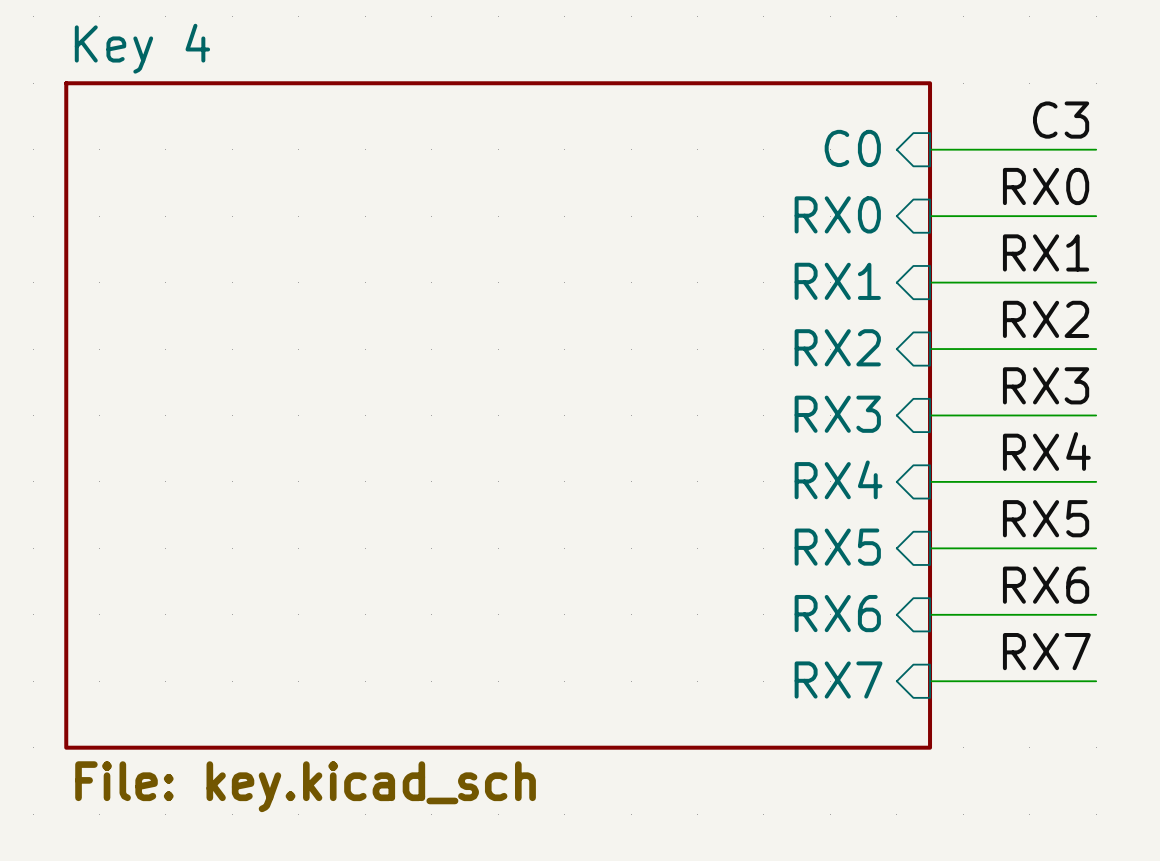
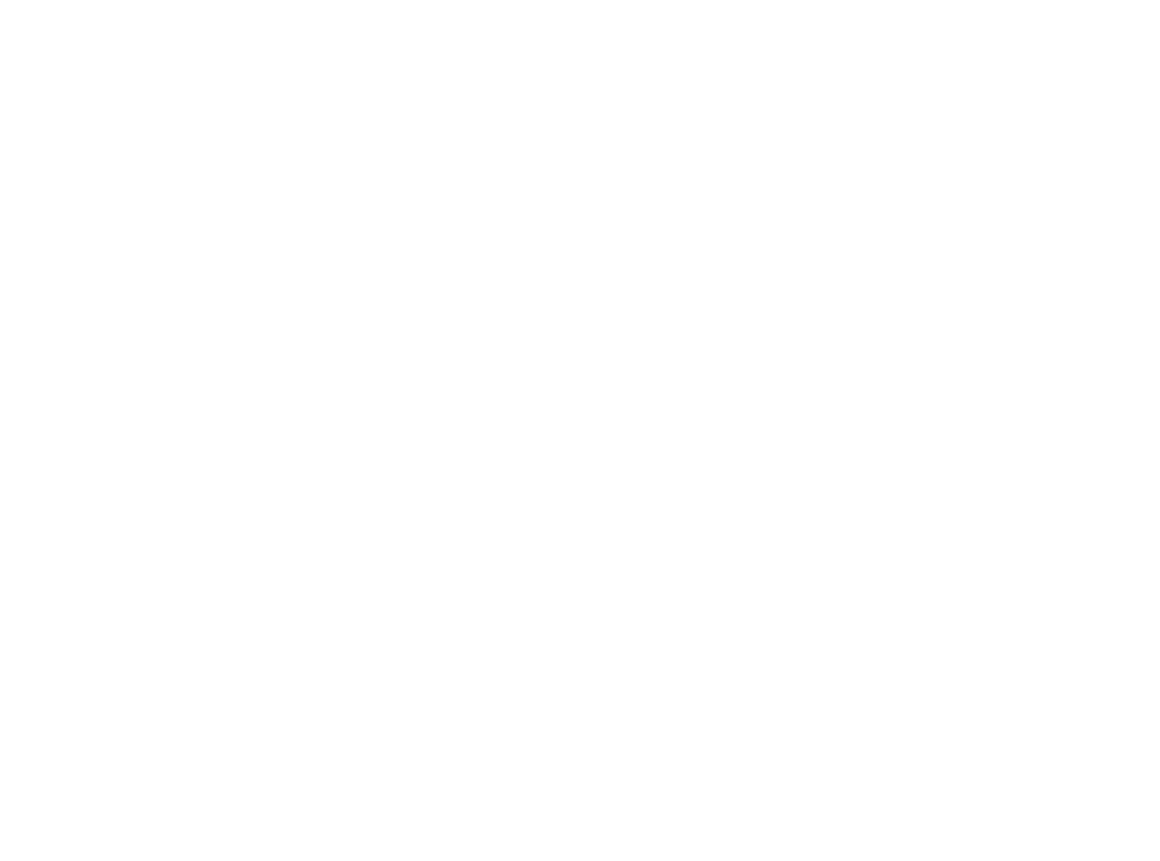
label: C3 (1061, 120) -> none
sheet pin: C0 (852, 148) -> none
wire: (930, 149) (1096, 149) -> none
label: RX0 (1046, 186) -> none
sheet pin: RX0 (837, 214) -> none
wire: (930, 216) (1096, 216) -> none
label: RX1 (1046, 252) -> none
sheet pin: RX1 (837, 281) -> none
wire: (930, 282) (1096, 282) -> none
label: RX2 (1046, 319) -> none
sheet pin: RX2 (837, 347) -> none
wire: (930, 349) (1096, 349) -> none
label: RX3 (1046, 385) -> none
sheet pin: RX3 (837, 414) -> none
sheet Key 4: File: key.kicad_sch (498, 415) -> none
wire: (930, 415) (1096, 415) -> none
label: RX4 (1046, 451) -> none
sheet pin: RX4 (838, 479) -> none
wire: (930, 481) (1096, 481) -> none
label: RX5 (1046, 518) -> none
sheet pin: RX5 (837, 547) -> none
wire: (930, 548) (1096, 548) -> none
label: RX6 (1046, 585) -> none
sheet pin: RX6 (837, 613) -> none
wire: (930, 614) (1096, 614) -> none
label: RX7 (1046, 651) -> none
sheet pin: RX7 (838, 680) -> none
wire: (930, 681) (1096, 681) -> none

